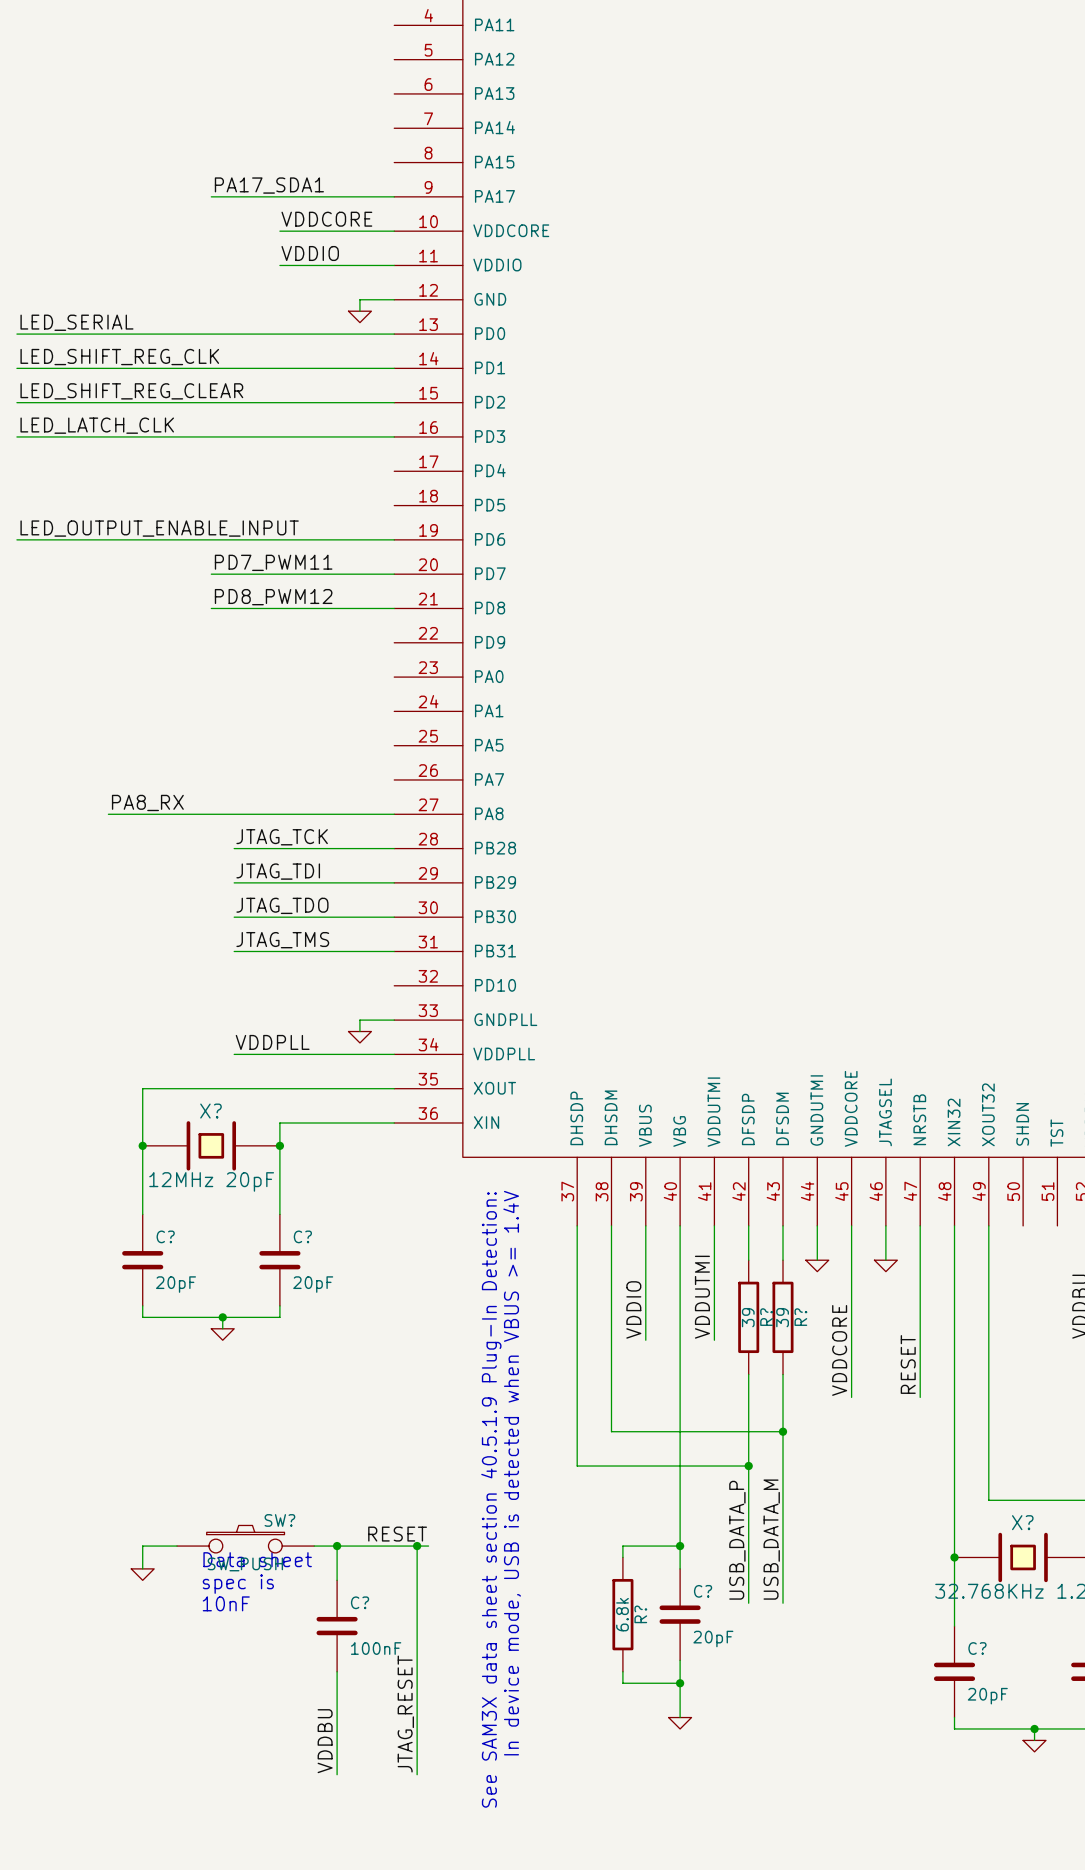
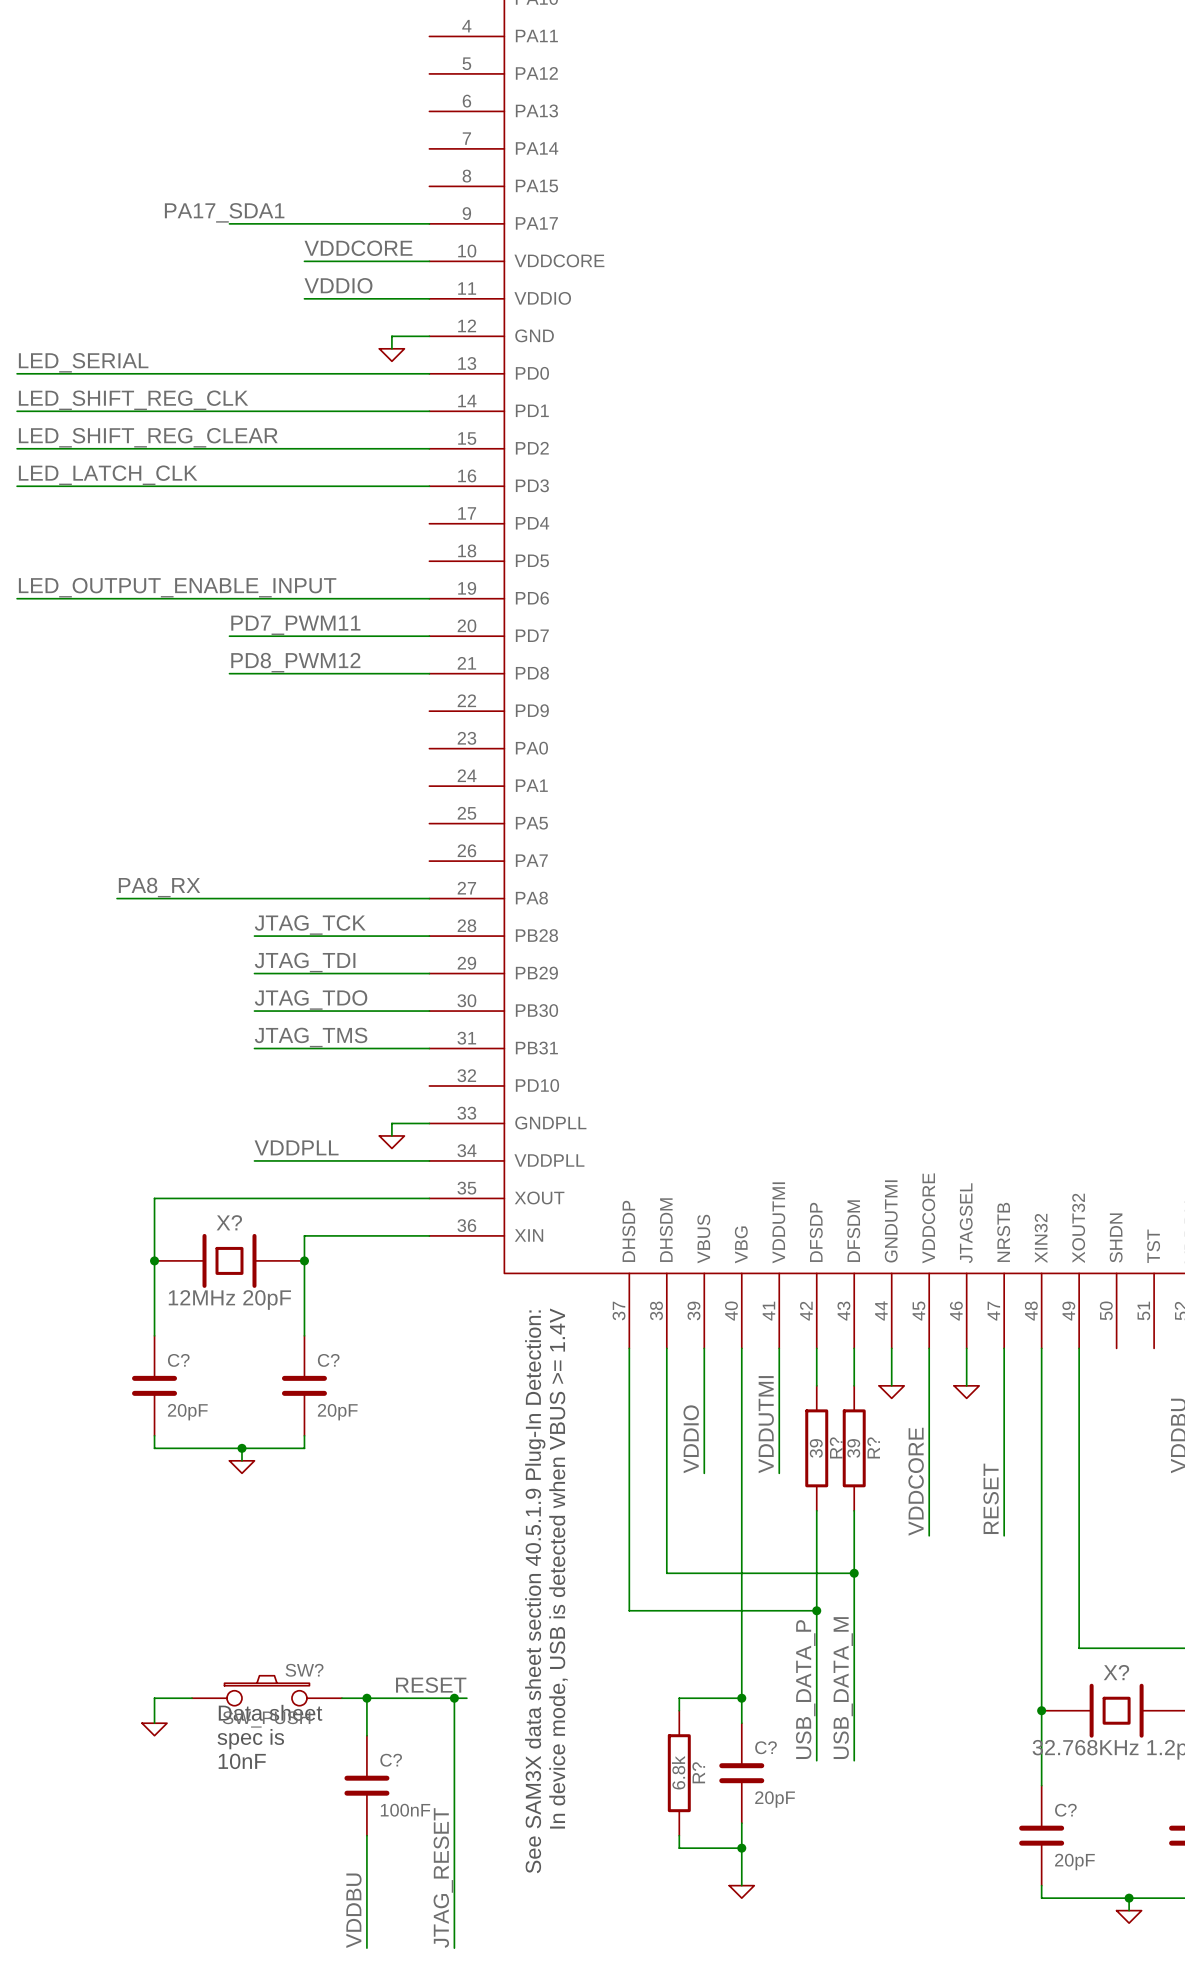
label position: PA17_SDA1 (269, 185) -> PA17_SDA1 (224, 212)

